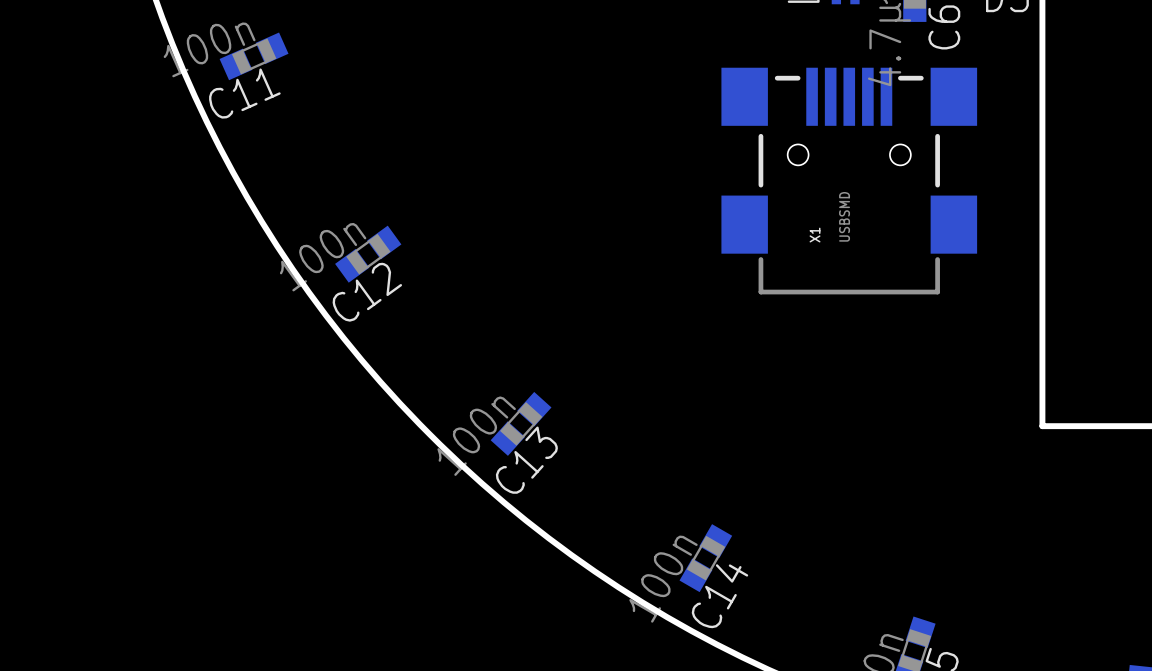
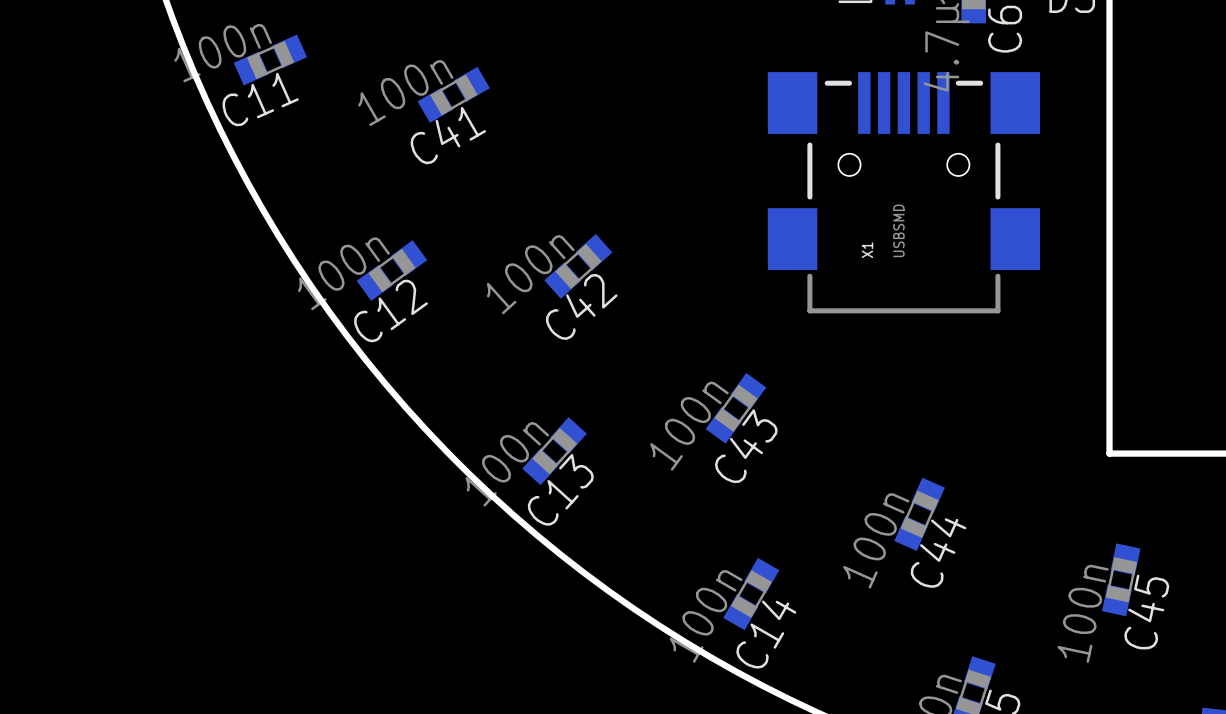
C41: none -> 100n (453, 94)
C42: none -> 100n (578, 266)
C43: none -> 100n (735, 408)
C44: none -> 100n (919, 514)
C45: none -> 100n (1121, 579)

